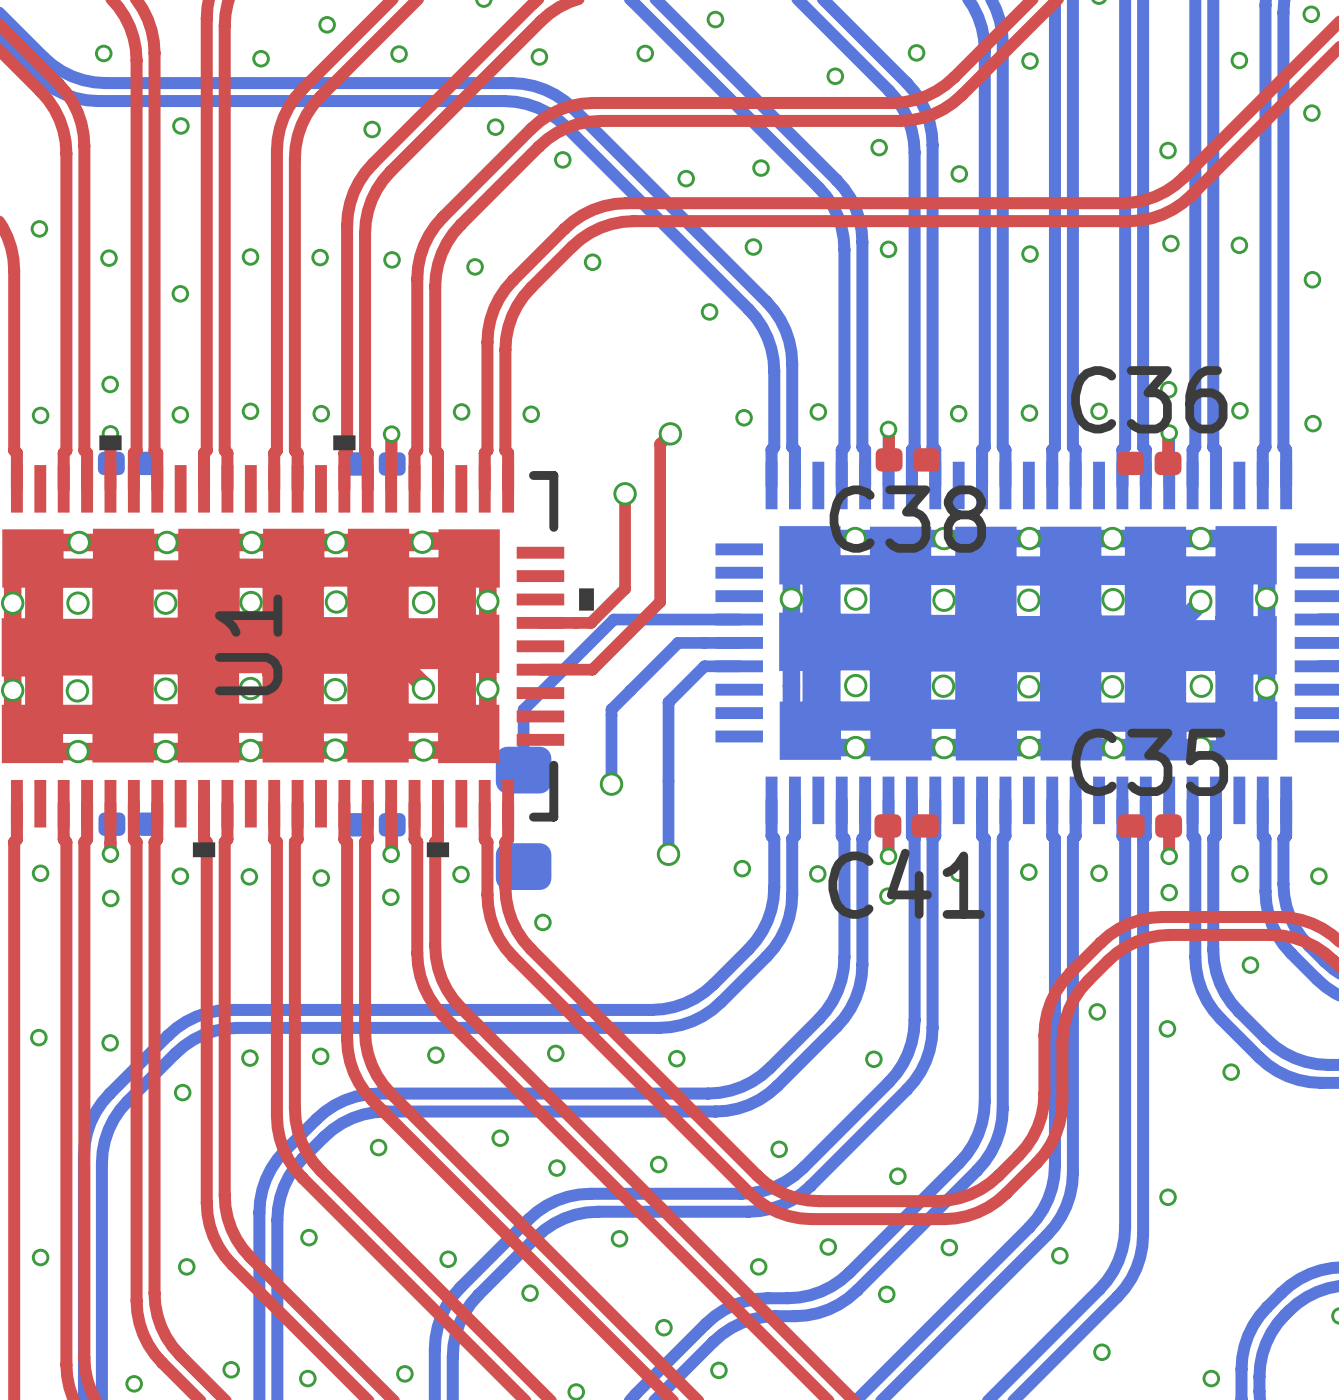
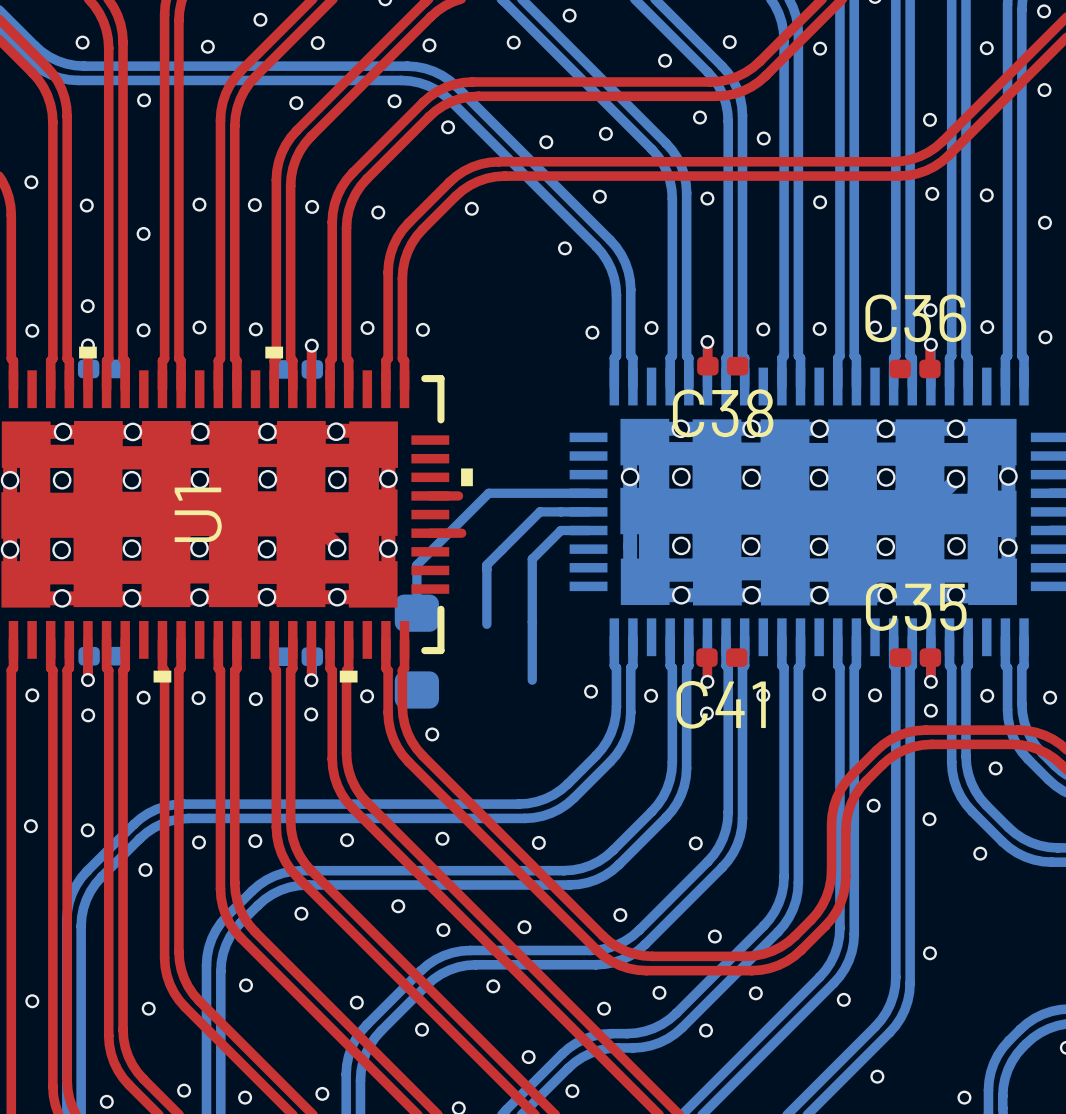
top track: (670, 433) (660, 444) (660, 601) (592, 669) (579, 669) -> none
via: (670, 433) -> none
top track: (625, 493) (625, 588) (591, 622) (575, 622) -> none
via: (625, 493) -> none
via: (611, 784) -> none
via: (668, 854) -> none

